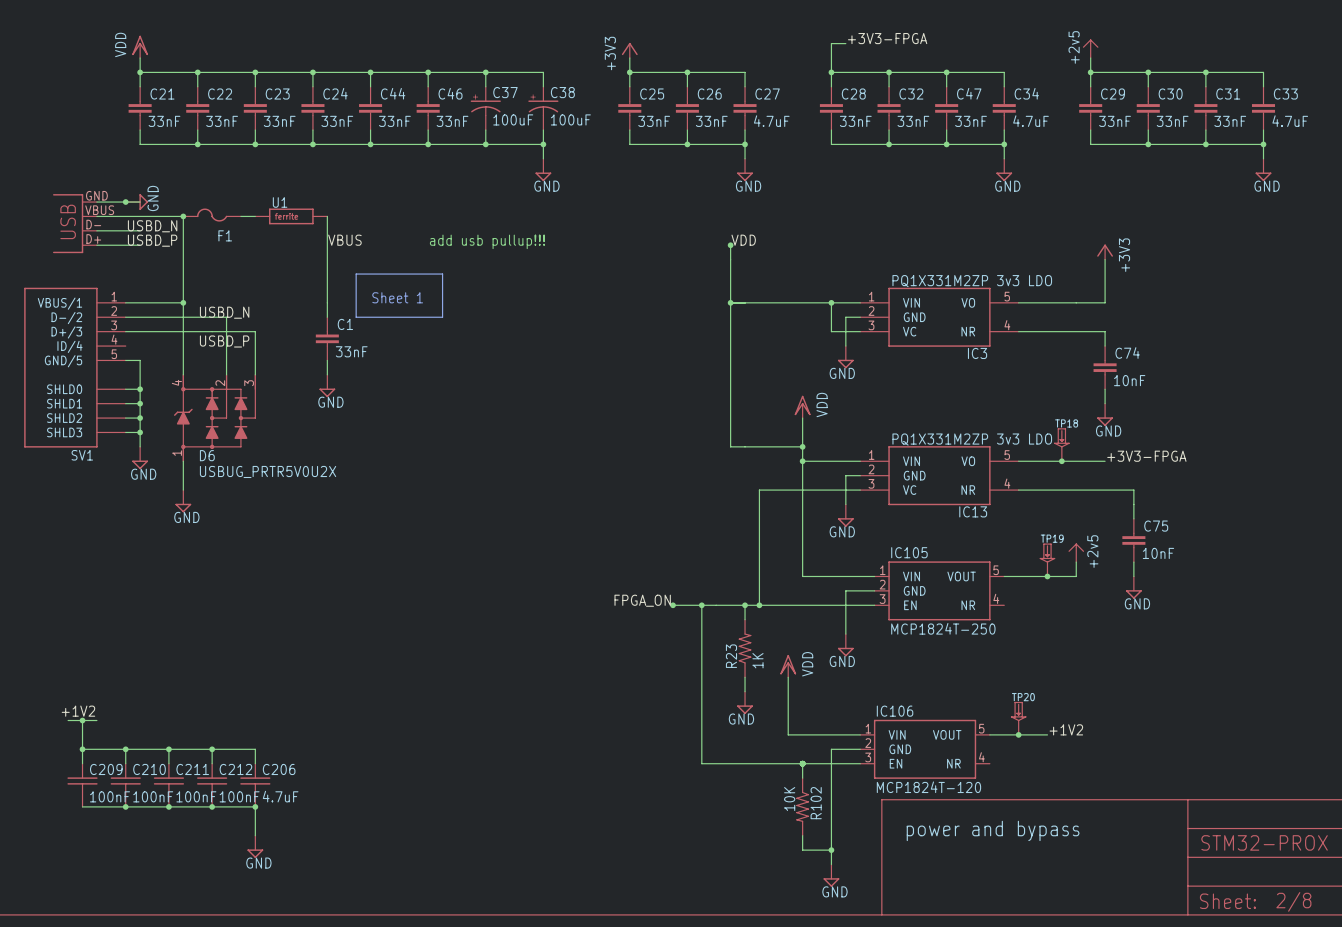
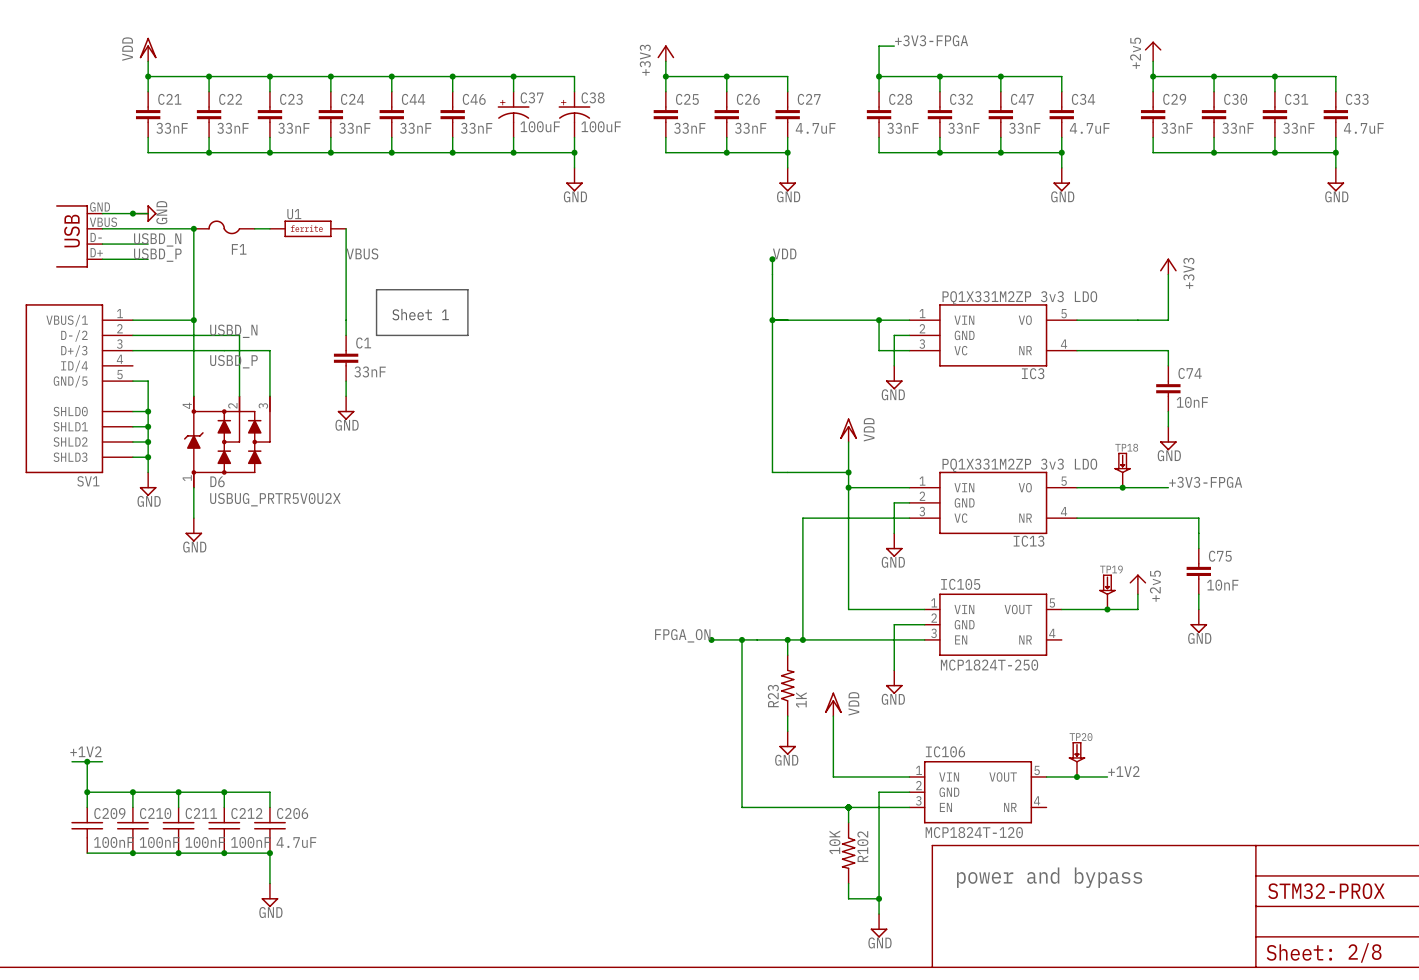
text: add usb pullup!!! (487, 241) -> none

